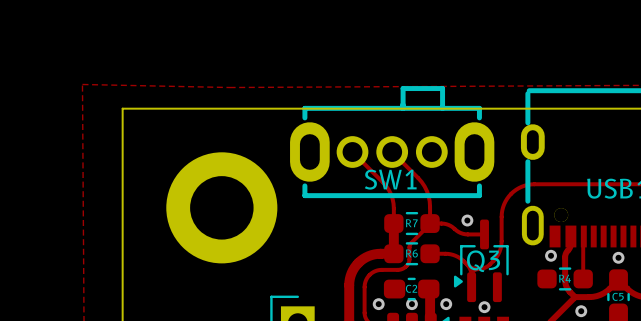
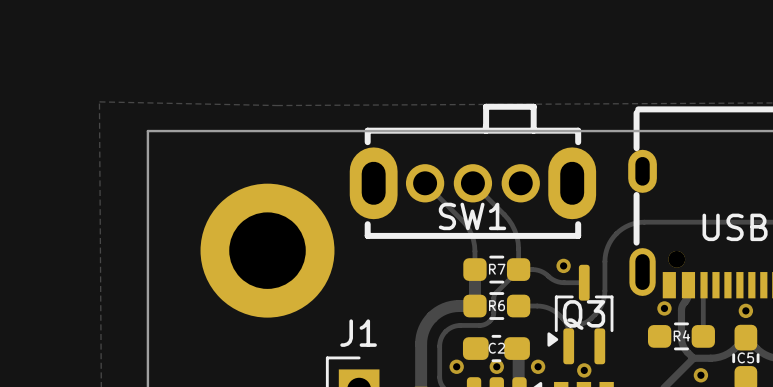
J1 name: none -> J1 (358, 333)

